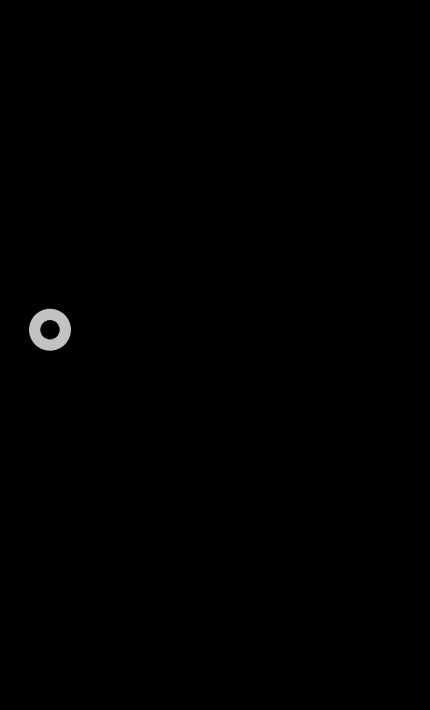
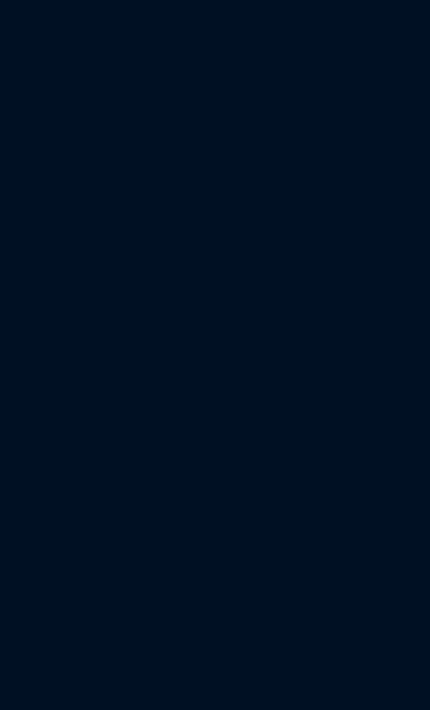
via: (49, 329) -> none

